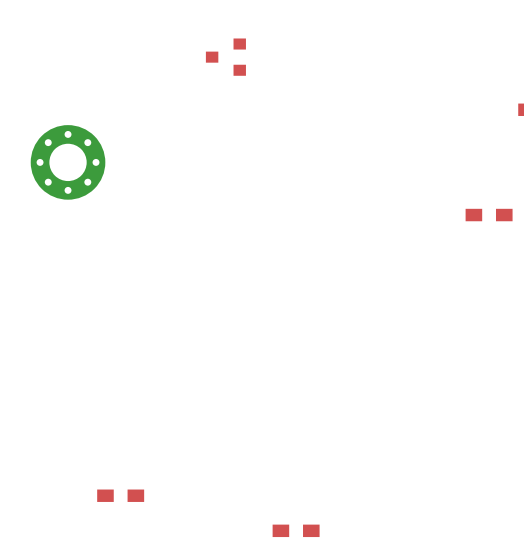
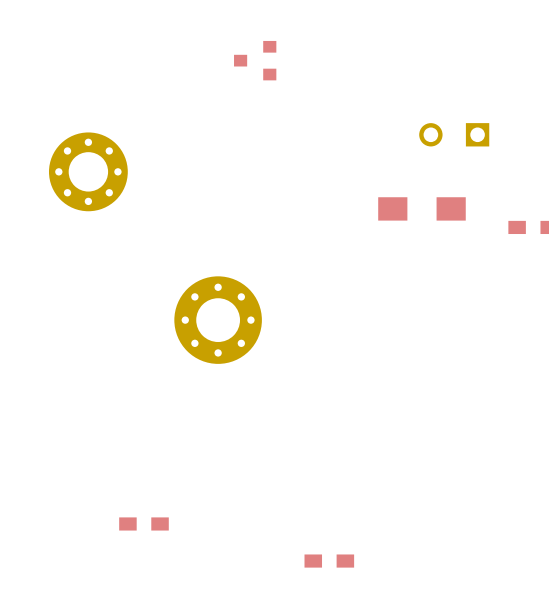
part: none -> (454, 134)
part: none -> (421, 208)
part: none -> (218, 320)

